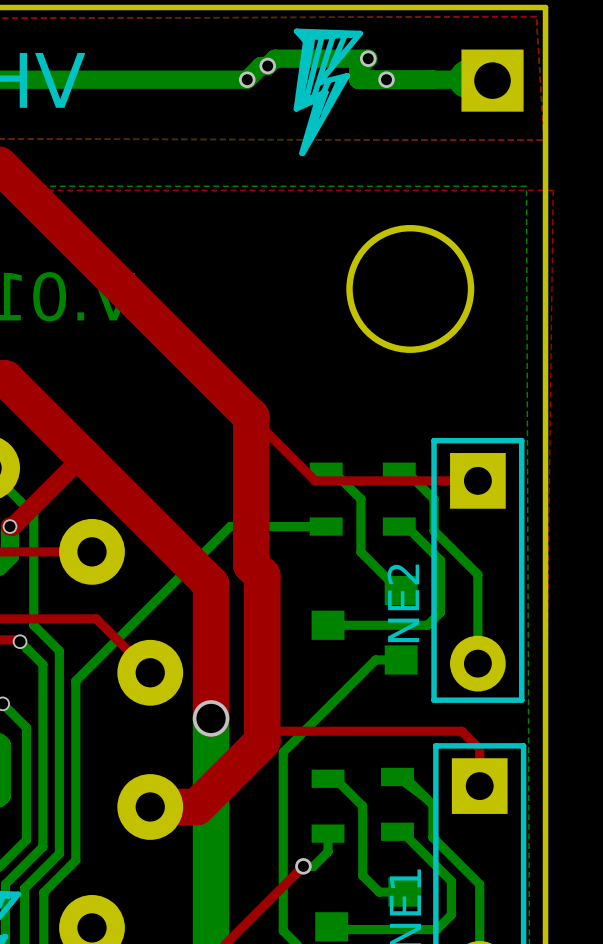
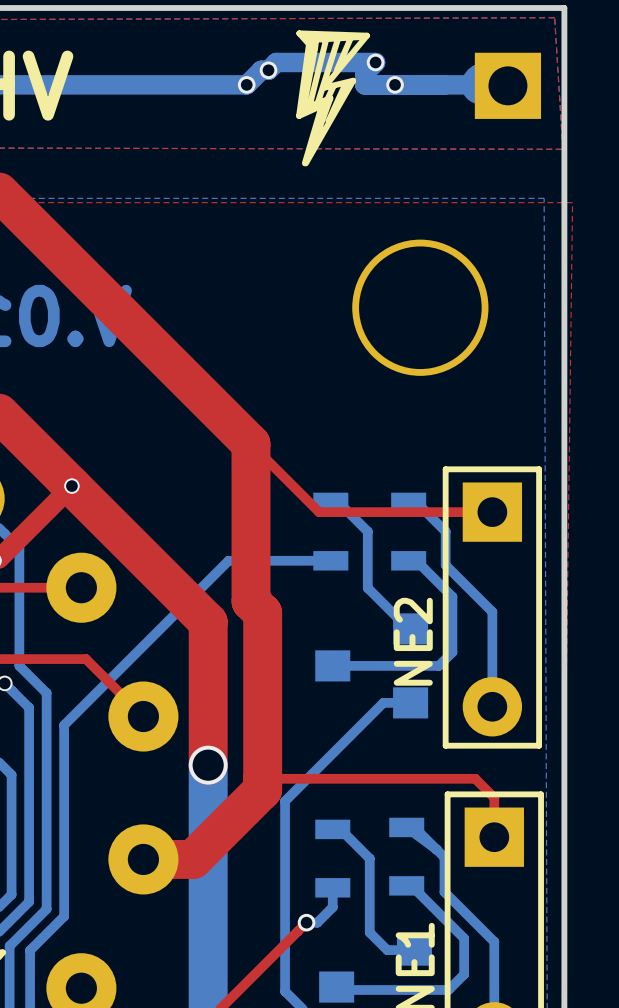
via: none -> (71, 486)

